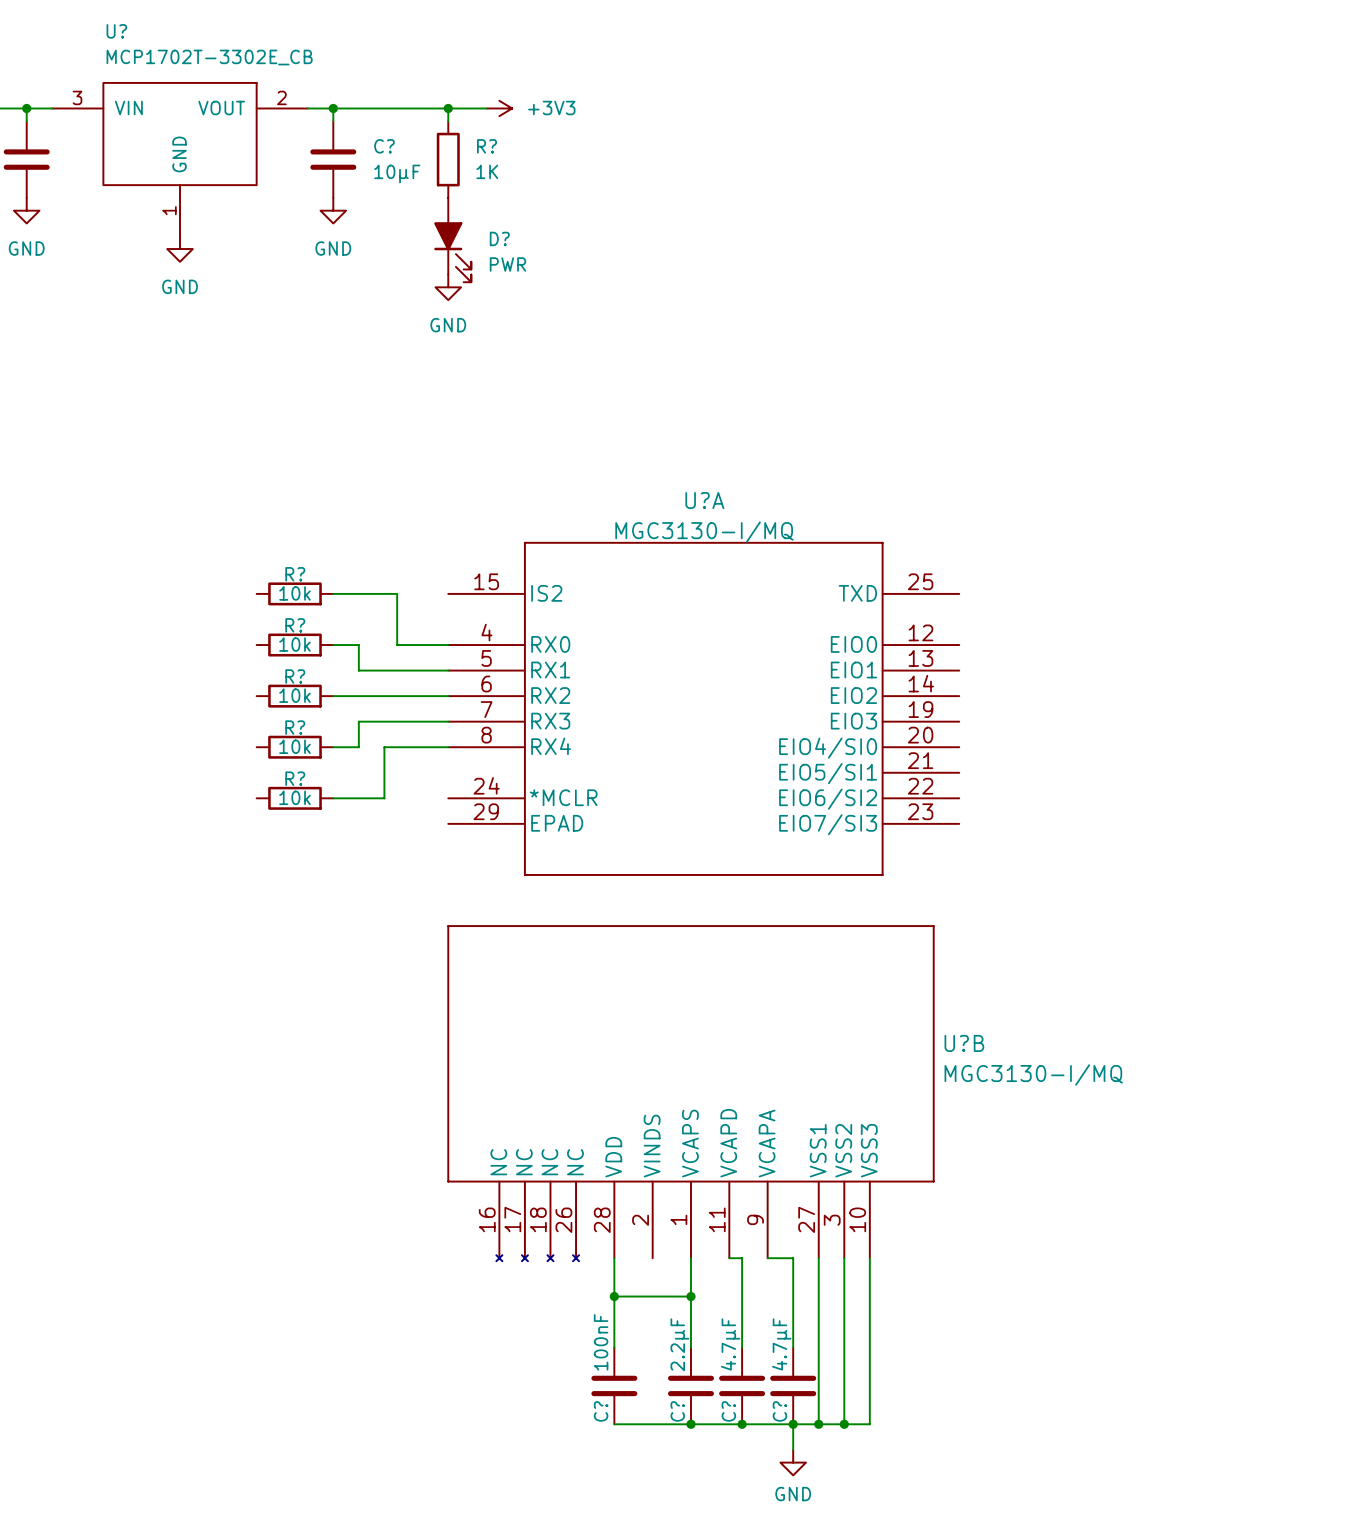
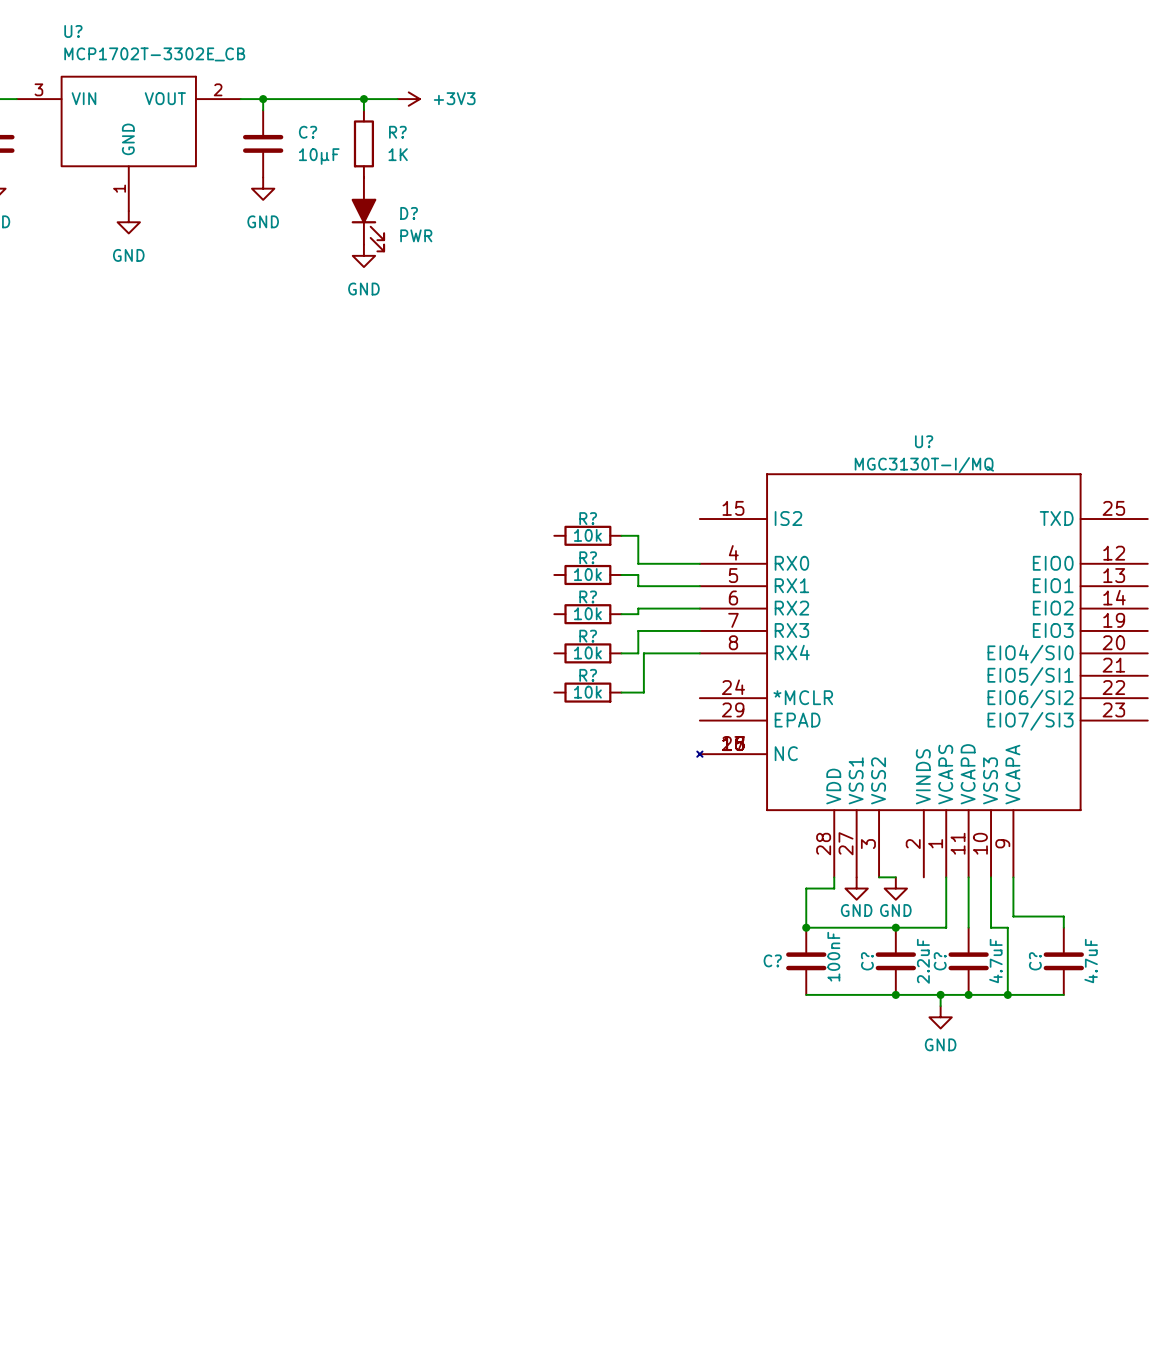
R?: 10k (294, 593) -> none
wire: (333, 593) (397, 593) (397, 645) (448, 645) -> none
R?: none -> 10k (587, 535)
wire: none -> (621, 535) (638, 535) (638, 563) (699, 563)
R?: 10k (294, 645) -> none
wire: (333, 645) (358, 645) (358, 670) (448, 670) -> none
R?: none -> 10k (587, 574)
wire: none -> (621, 574) (638, 574) (638, 586) (699, 586)
wire: none -> (699, 608) (638, 608) (638, 614) (621, 614)
R?: 10k (294, 696) -> none
wire: (333, 696) (448, 696) -> none
R?: none -> 10k (587, 614)
U?A: MGC3130-I/MQ (703, 708) -> none
wire: none -> (699, 630) (638, 630) (638, 653) (621, 653)
wire: (448, 721) (358, 721) (358, 747) (333, 747) -> none
R?: none -> 10k (587, 653)
wire: none -> (699, 653) (643, 653) (643, 692) (621, 692)
R?: 10k (294, 747) -> none
wire: (448, 747) (384, 747) (384, 798) (333, 798) -> none
U?: none -> MGC3130T-I/MQ (922, 675)
R?: none -> 10k (587, 692)
R?: 10k (294, 798) -> none
wire: none -> (834, 877) (834, 888) (806, 888) (806, 927) (946, 927) (946, 877)
wire: none -> (879, 877) (895, 877)
wire: none -> (968, 877) (968, 927)
wire: none -> (991, 877) (991, 927) (1007, 927) (1007, 994)
wire: none -> (1013, 877) (1013, 916) (1063, 916) (1063, 927)
power symbol: none -> GND (856, 888)
power symbol: none -> GND (895, 888)
junction: none -> (806, 927)
junction: none -> (895, 927)
C?: none -> 100nF (806, 961)
C?: none -> 2.2uF (895, 961)
C?: none -> 4.7uF (968, 961)
C?: none -> 4.7uF (1063, 961)
U?B: MGC3130-I/MQ (691, 1093) -> none
wire: none -> (806, 994) (1063, 994)
junction: none -> (895, 994)
wire: none -> (940, 994) (940, 1006)
junction: none -> (940, 994)
junction: none -> (968, 994)
junction: none -> (1007, 994)
power symbol: none -> GND (940, 1017)
wire: (614, 1258) (614, 1347) -> none
wire: (691, 1258) (691, 1347) -> none
wire: (729, 1258) (742, 1258) (742, 1347) -> none
wire: (767, 1258) (793, 1258) (793, 1347) -> none
wire: (818, 1258) (818, 1424) -> none
wire: (844, 1258) (844, 1424) -> none
wire: (869, 1258) (869, 1424) (614, 1424) -> none
wire: (614, 1296) (691, 1296) -> none
junction: (614, 1296) -> none
junction: (691, 1296) -> none
C?: 100nF (614, 1385) -> none
C?: 2.2μF (691, 1385) -> none
C?: 4.7μF (742, 1385) -> none
C?: 4.7μF (793, 1385) -> none
junction: (691, 1424) -> none
junction: (742, 1424) -> none
wire: (793, 1424) (793, 1449) -> none
junction: (793, 1424) -> none
junction: (818, 1424) -> none
junction: (844, 1424) -> none
power symbol: GND (793, 1462) -> none

